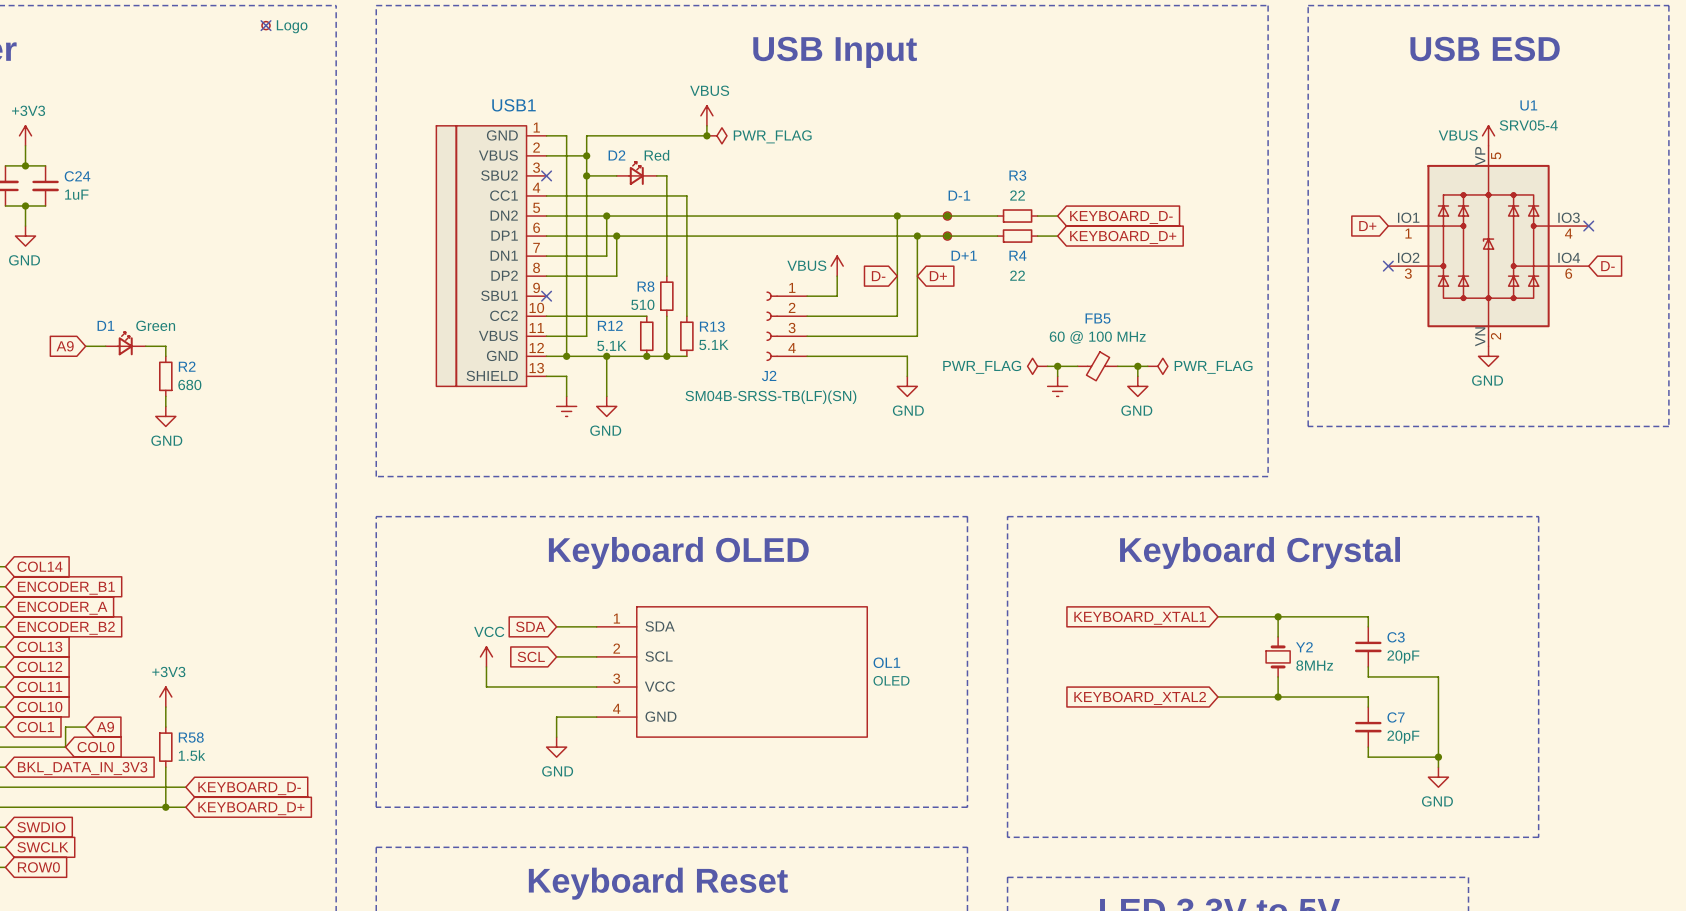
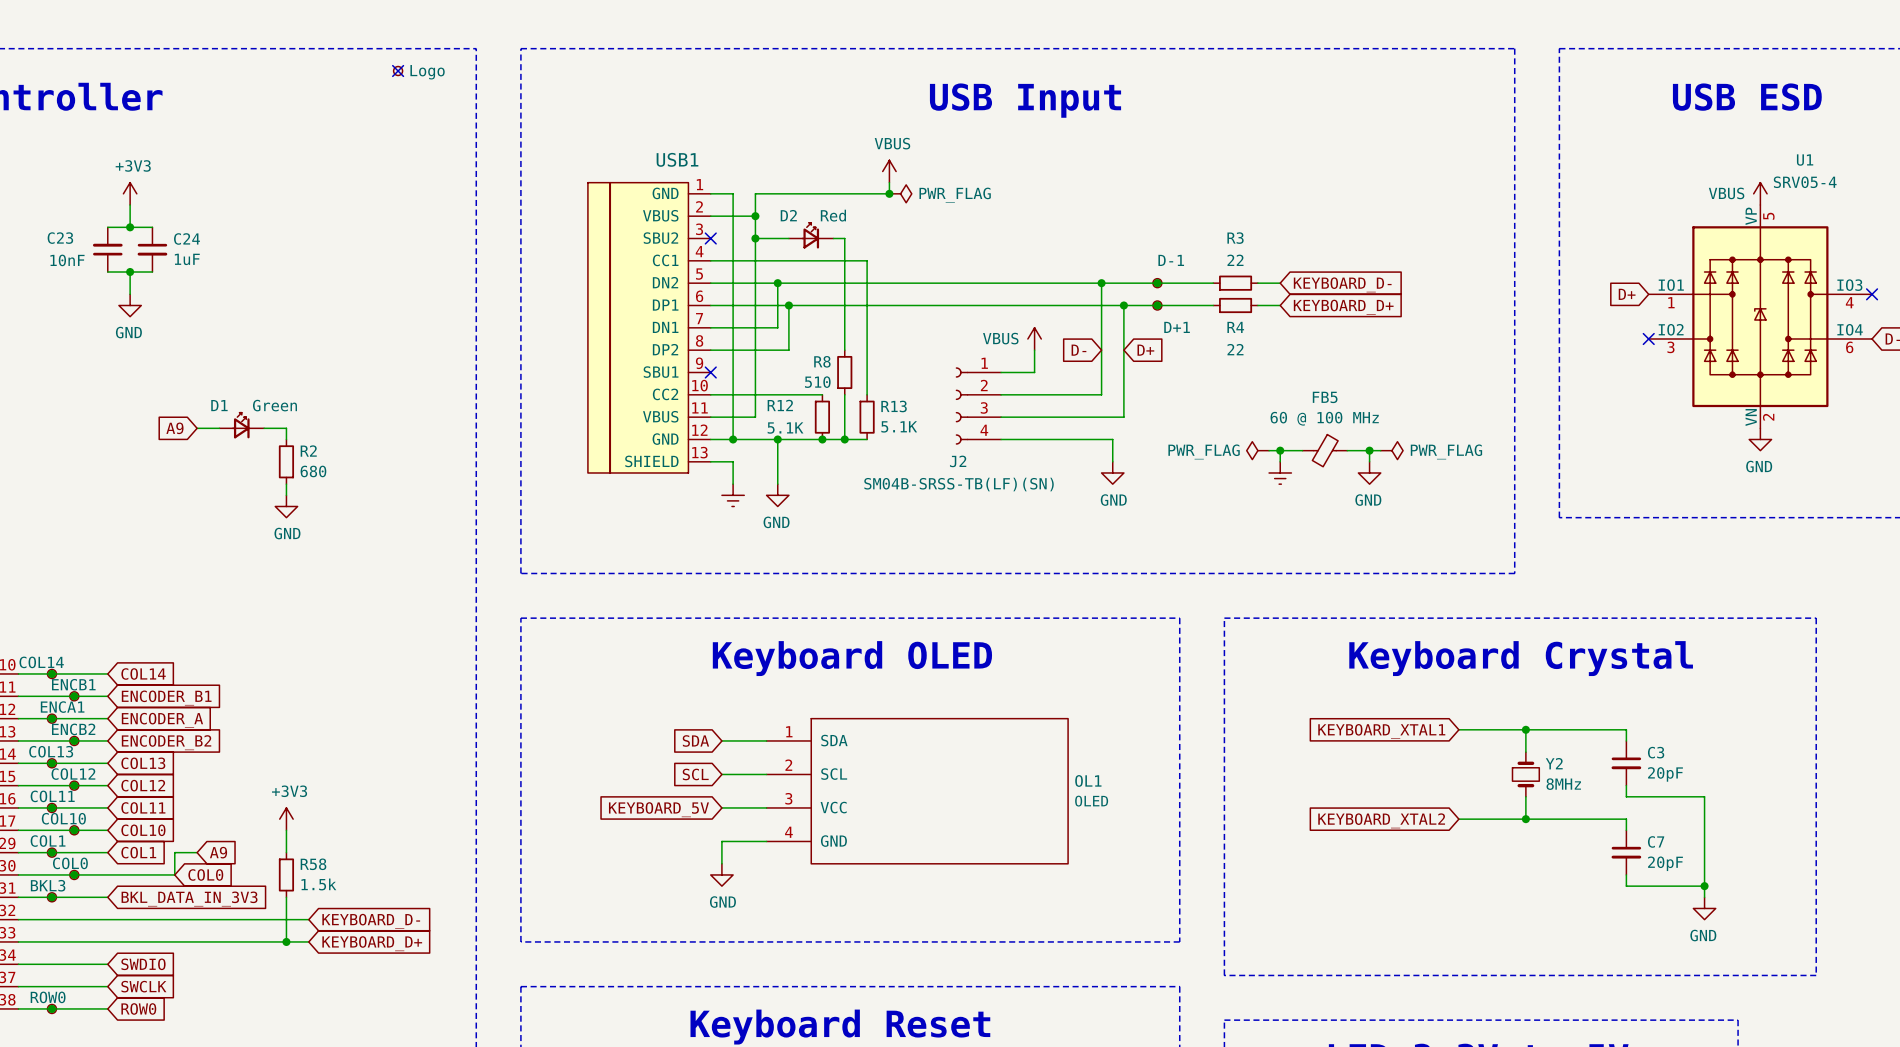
power symbol: VCC (486, 656) -> none
wire: (486, 666) (486, 686) (556, 686) -> none
global label: none -> KEYBOARD_5V (658, 809)

